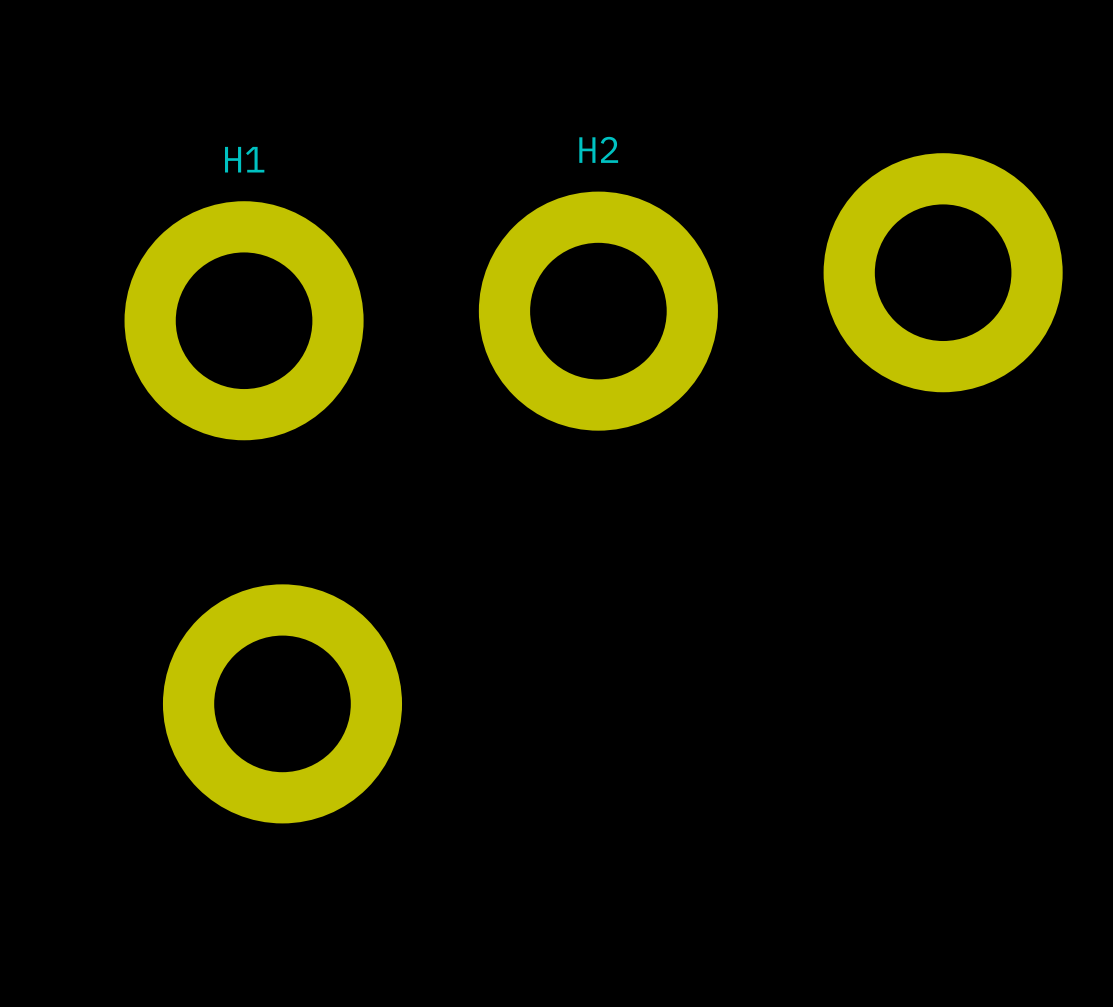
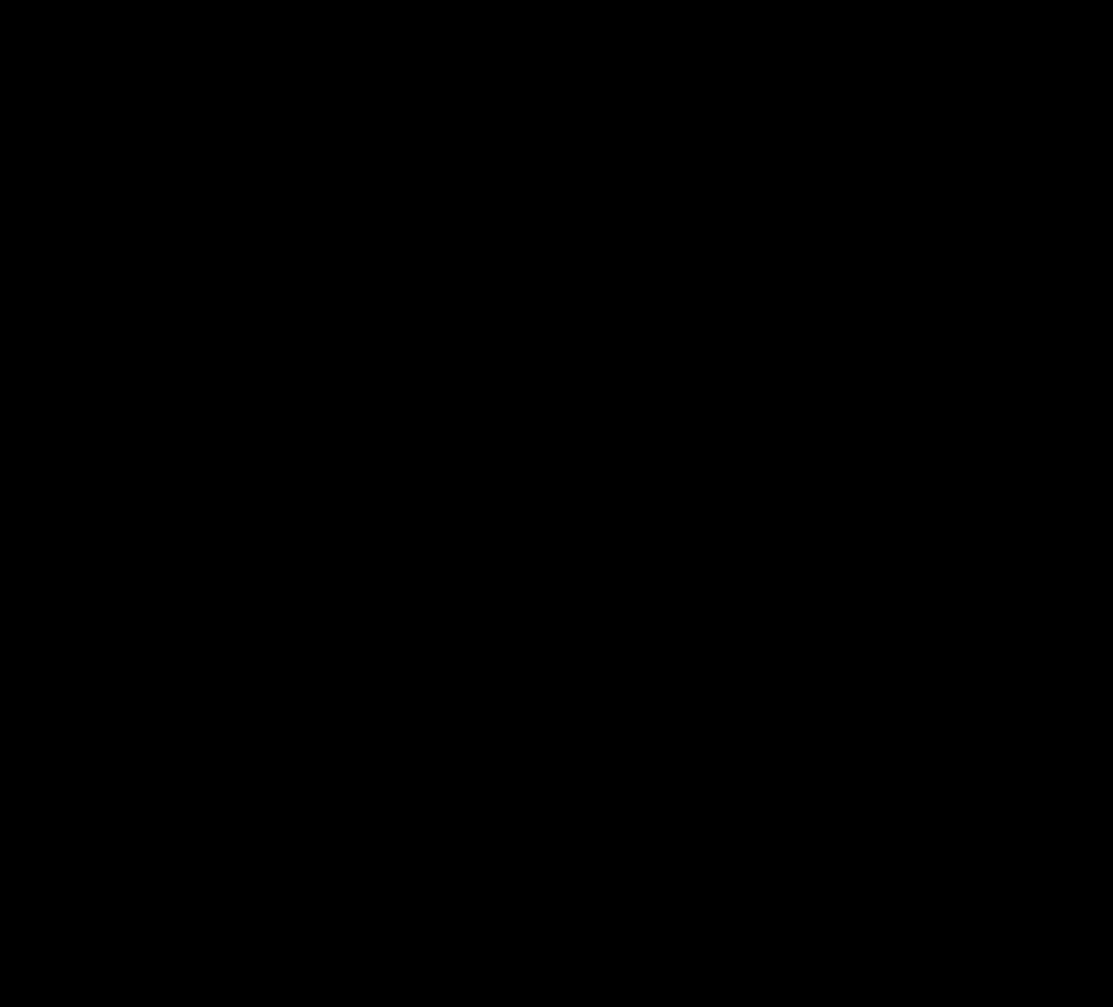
part: (943, 272) -> none
H2: (598, 311) -> none
H1: (244, 320) -> none
part: (282, 703) -> none

